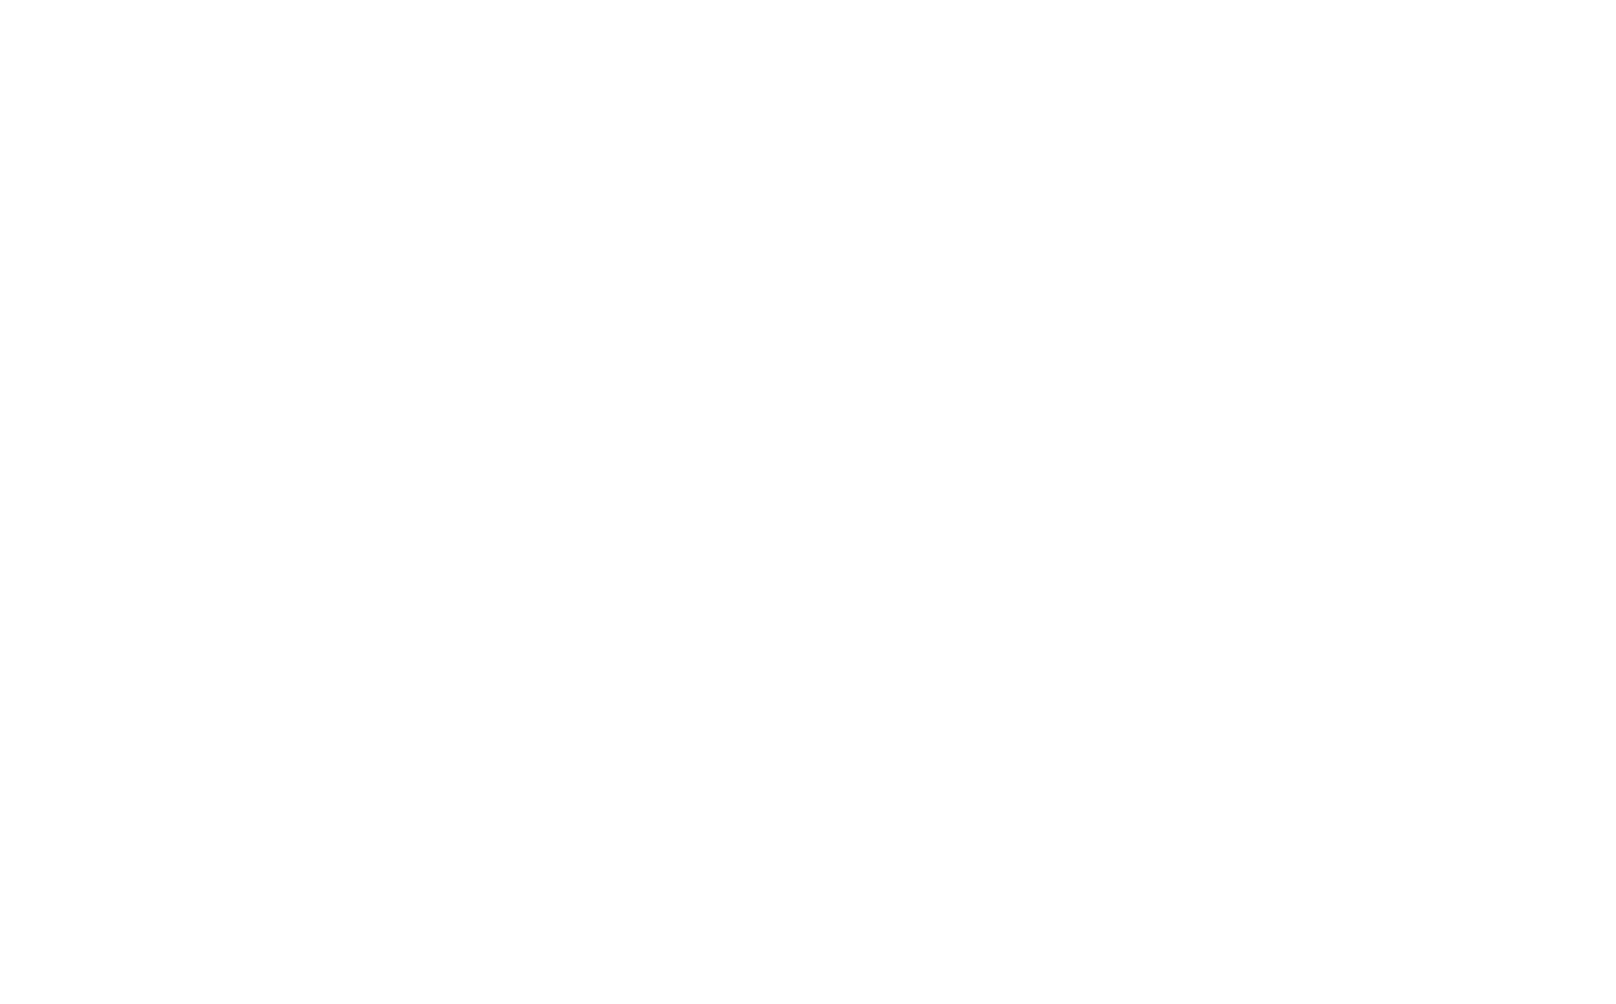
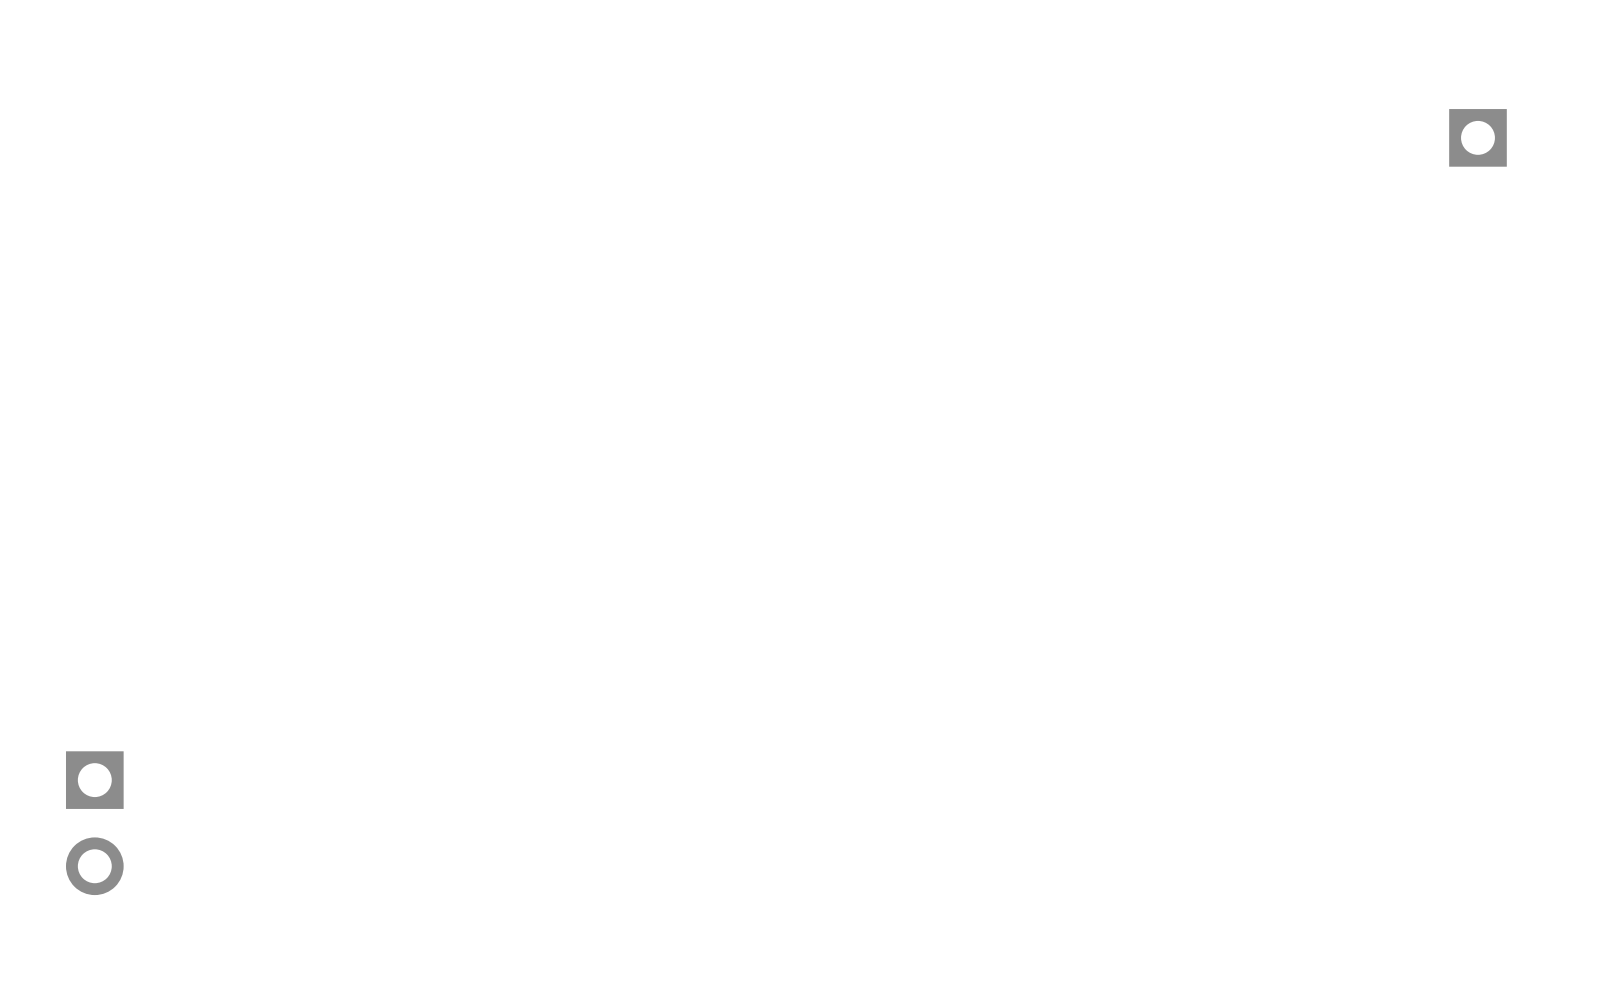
part: none -> (1477, 137)
part: none -> (94, 823)

